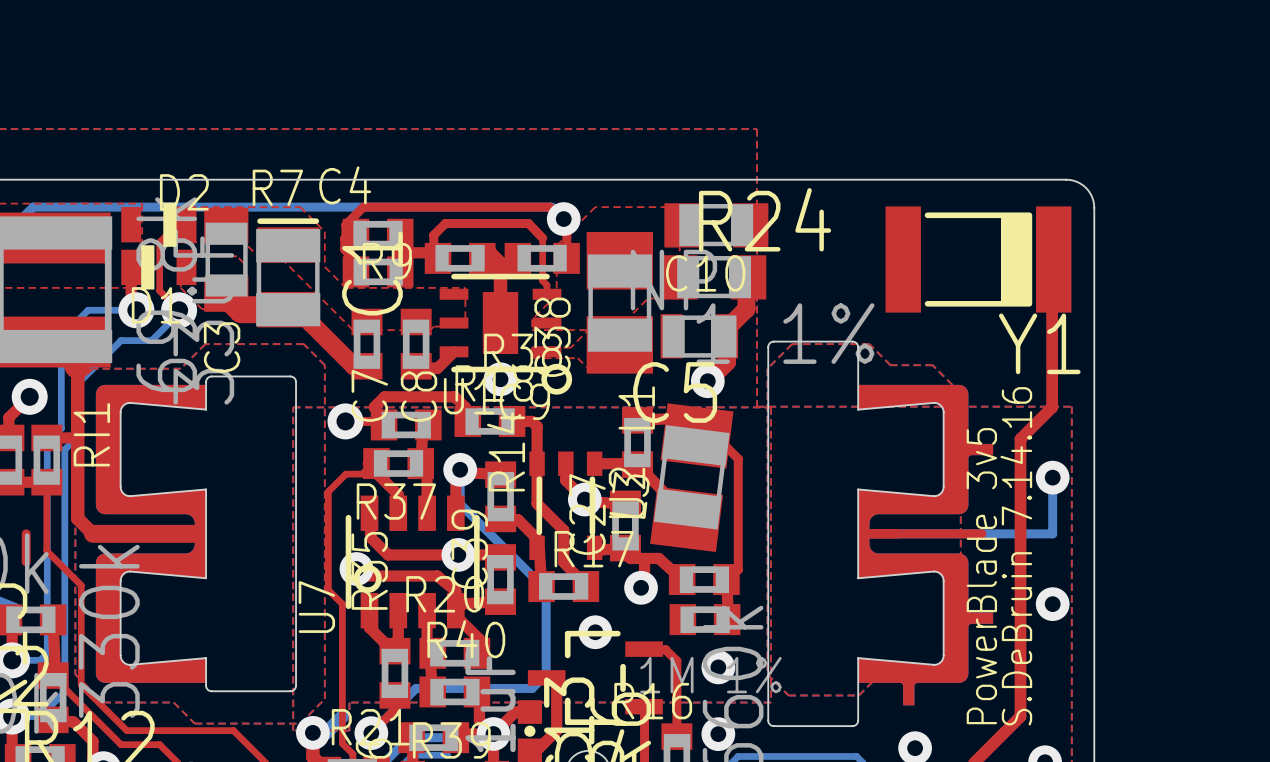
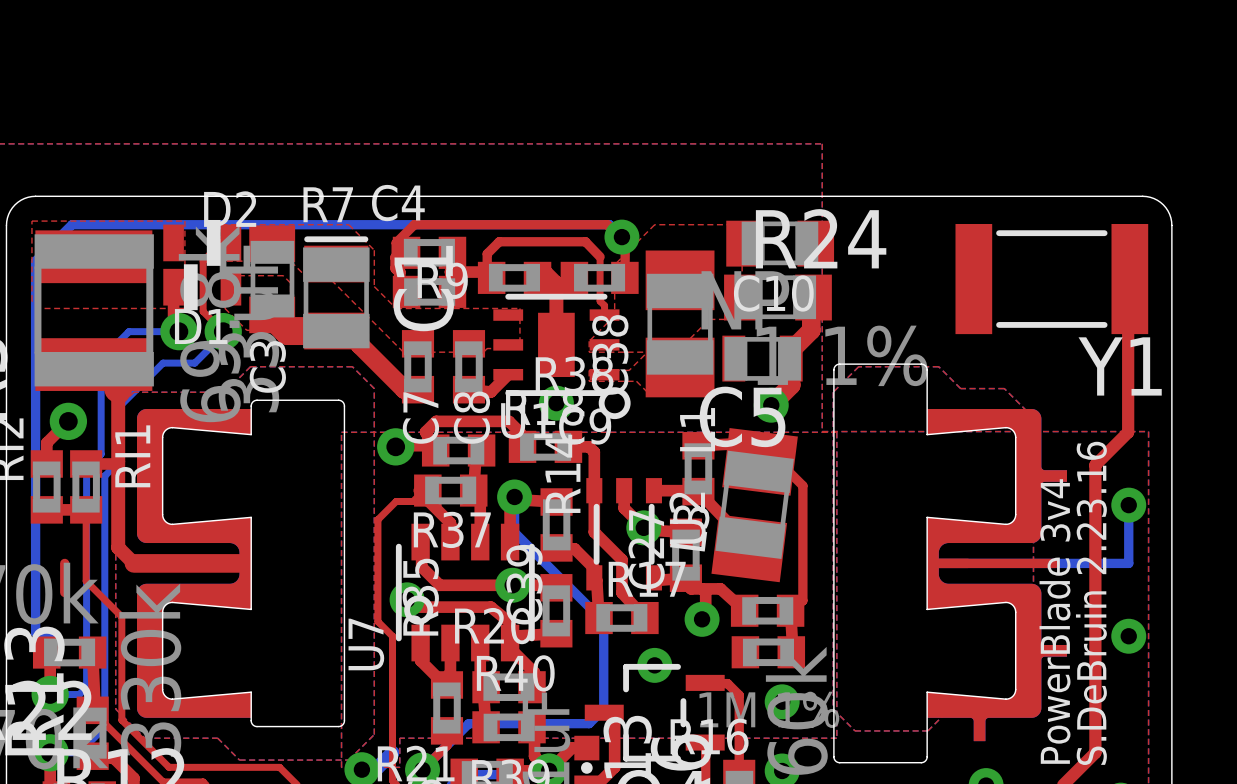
Y1 footprint: [885, 206, 1072, 313] -> [955, 223, 1149, 335]
text: S.DeBruin 7.14.16 (1016, 556) -> S.DeBruin 2.23.16 (1091, 603)
text: PowerBlade 3v5 (981, 576) -> PowerBlade 3v4 (1055, 621)

